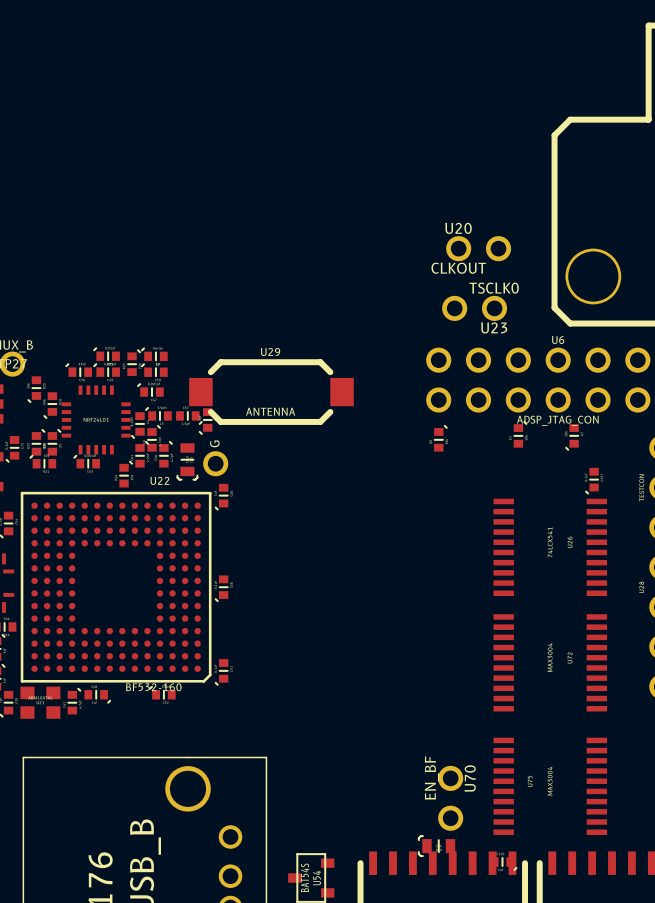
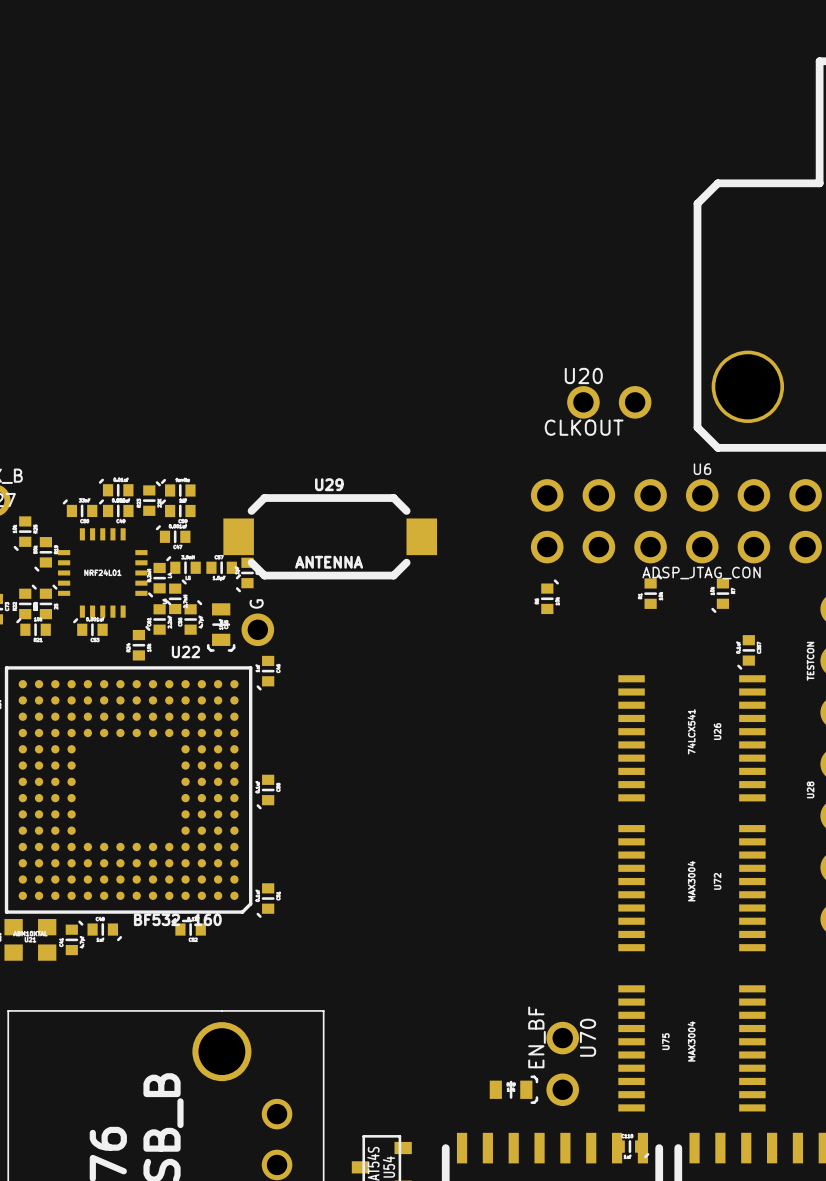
U20 position: (478, 248) -> (609, 402)
U23: TSCLK0 (474, 308) -> none
part rotation: 0° (436, 846) -> 180° (513, 1089)
part position: (436, 846) -> (513, 1089)

